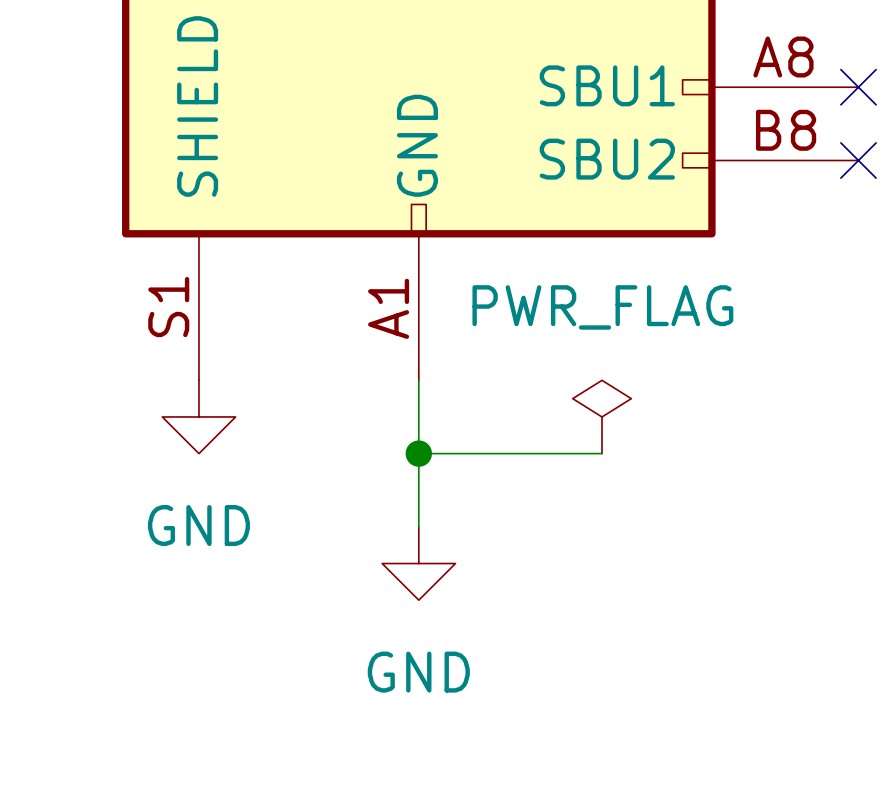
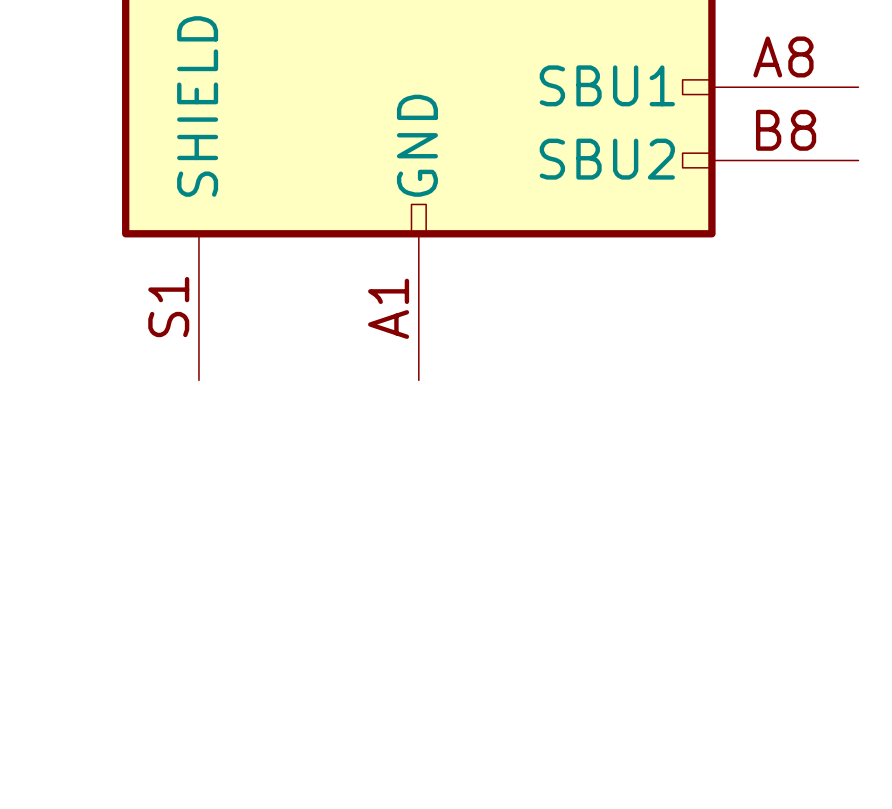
no-connect mark: (858, 87) -> none
no-connect mark: (858, 160) -> none
wire: (418, 380) (418, 526) -> none
power symbol: GND (198, 416) -> none
power symbol: PWR_FLAG (602, 416) -> none
wire: (418, 453) (602, 453) -> none
junction: (418, 453) -> none
power symbol: GND (418, 563) -> none

